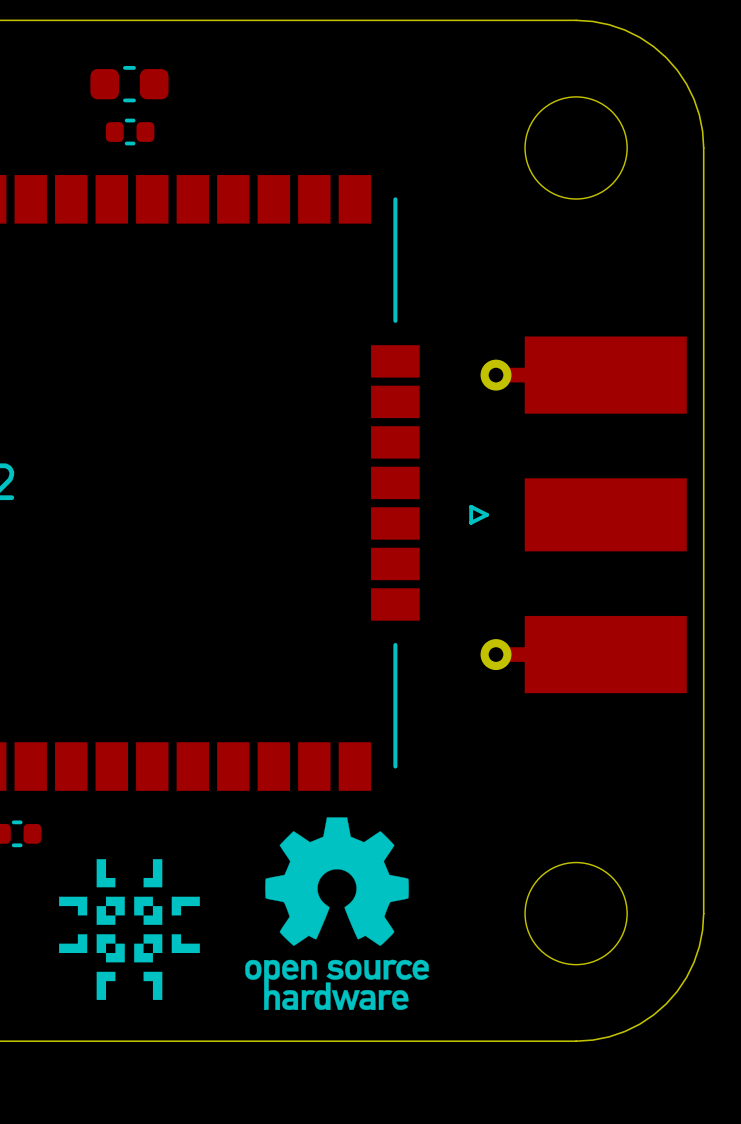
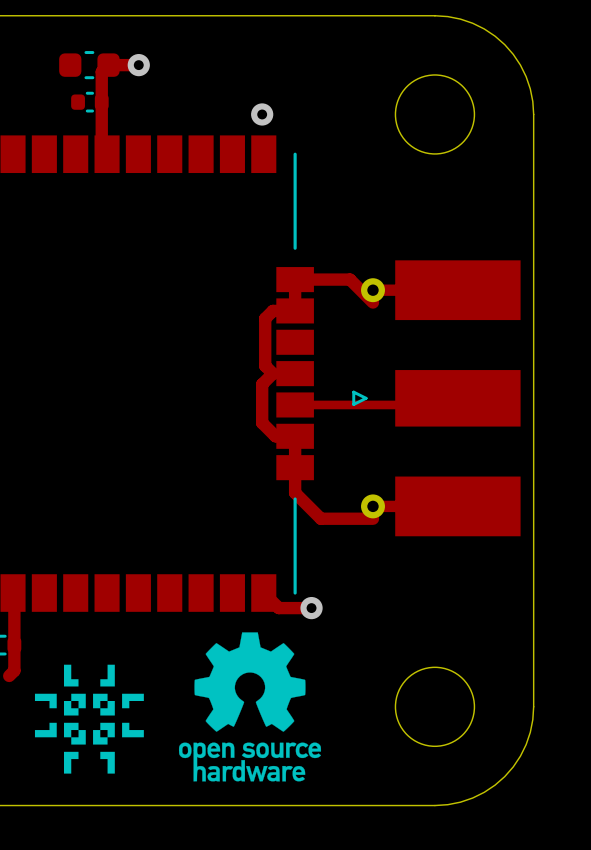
track: none -> (138, 65) (108, 65) (101, 71) (101, 148) (107, 154)
via: none -> (138, 65)
via: none -> (262, 114)
track: none -> (372, 302) (350, 279) (295, 279) (295, 310) (272, 310) (265, 318) (265, 365) (272, 373) (262, 384) (262, 422) (275, 436) (295, 436) (295, 492) (320, 518) (372, 518)
track: none -> (295, 404) (452, 404) (457, 410)
track: none -> (13, 593) (14, 670) (9, 675)
track: none -> (263, 593) (278, 608) (311, 608)
via: none -> (311, 608)

